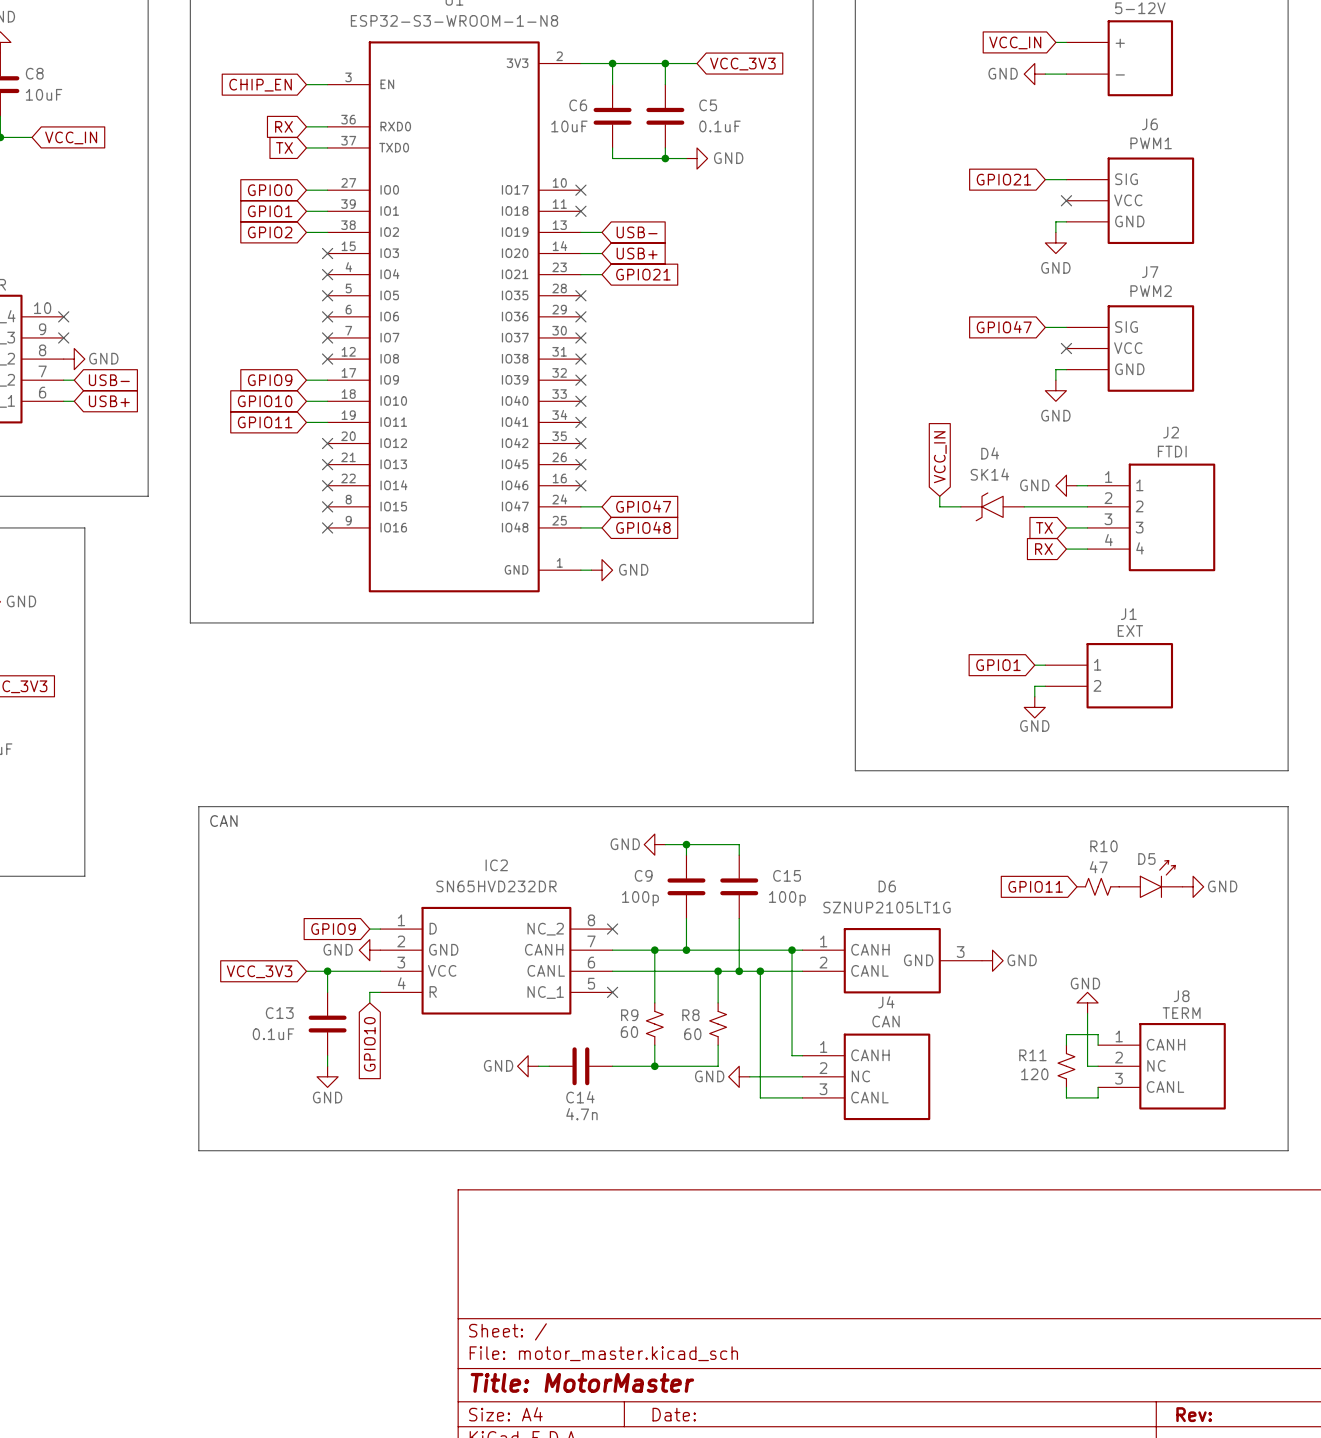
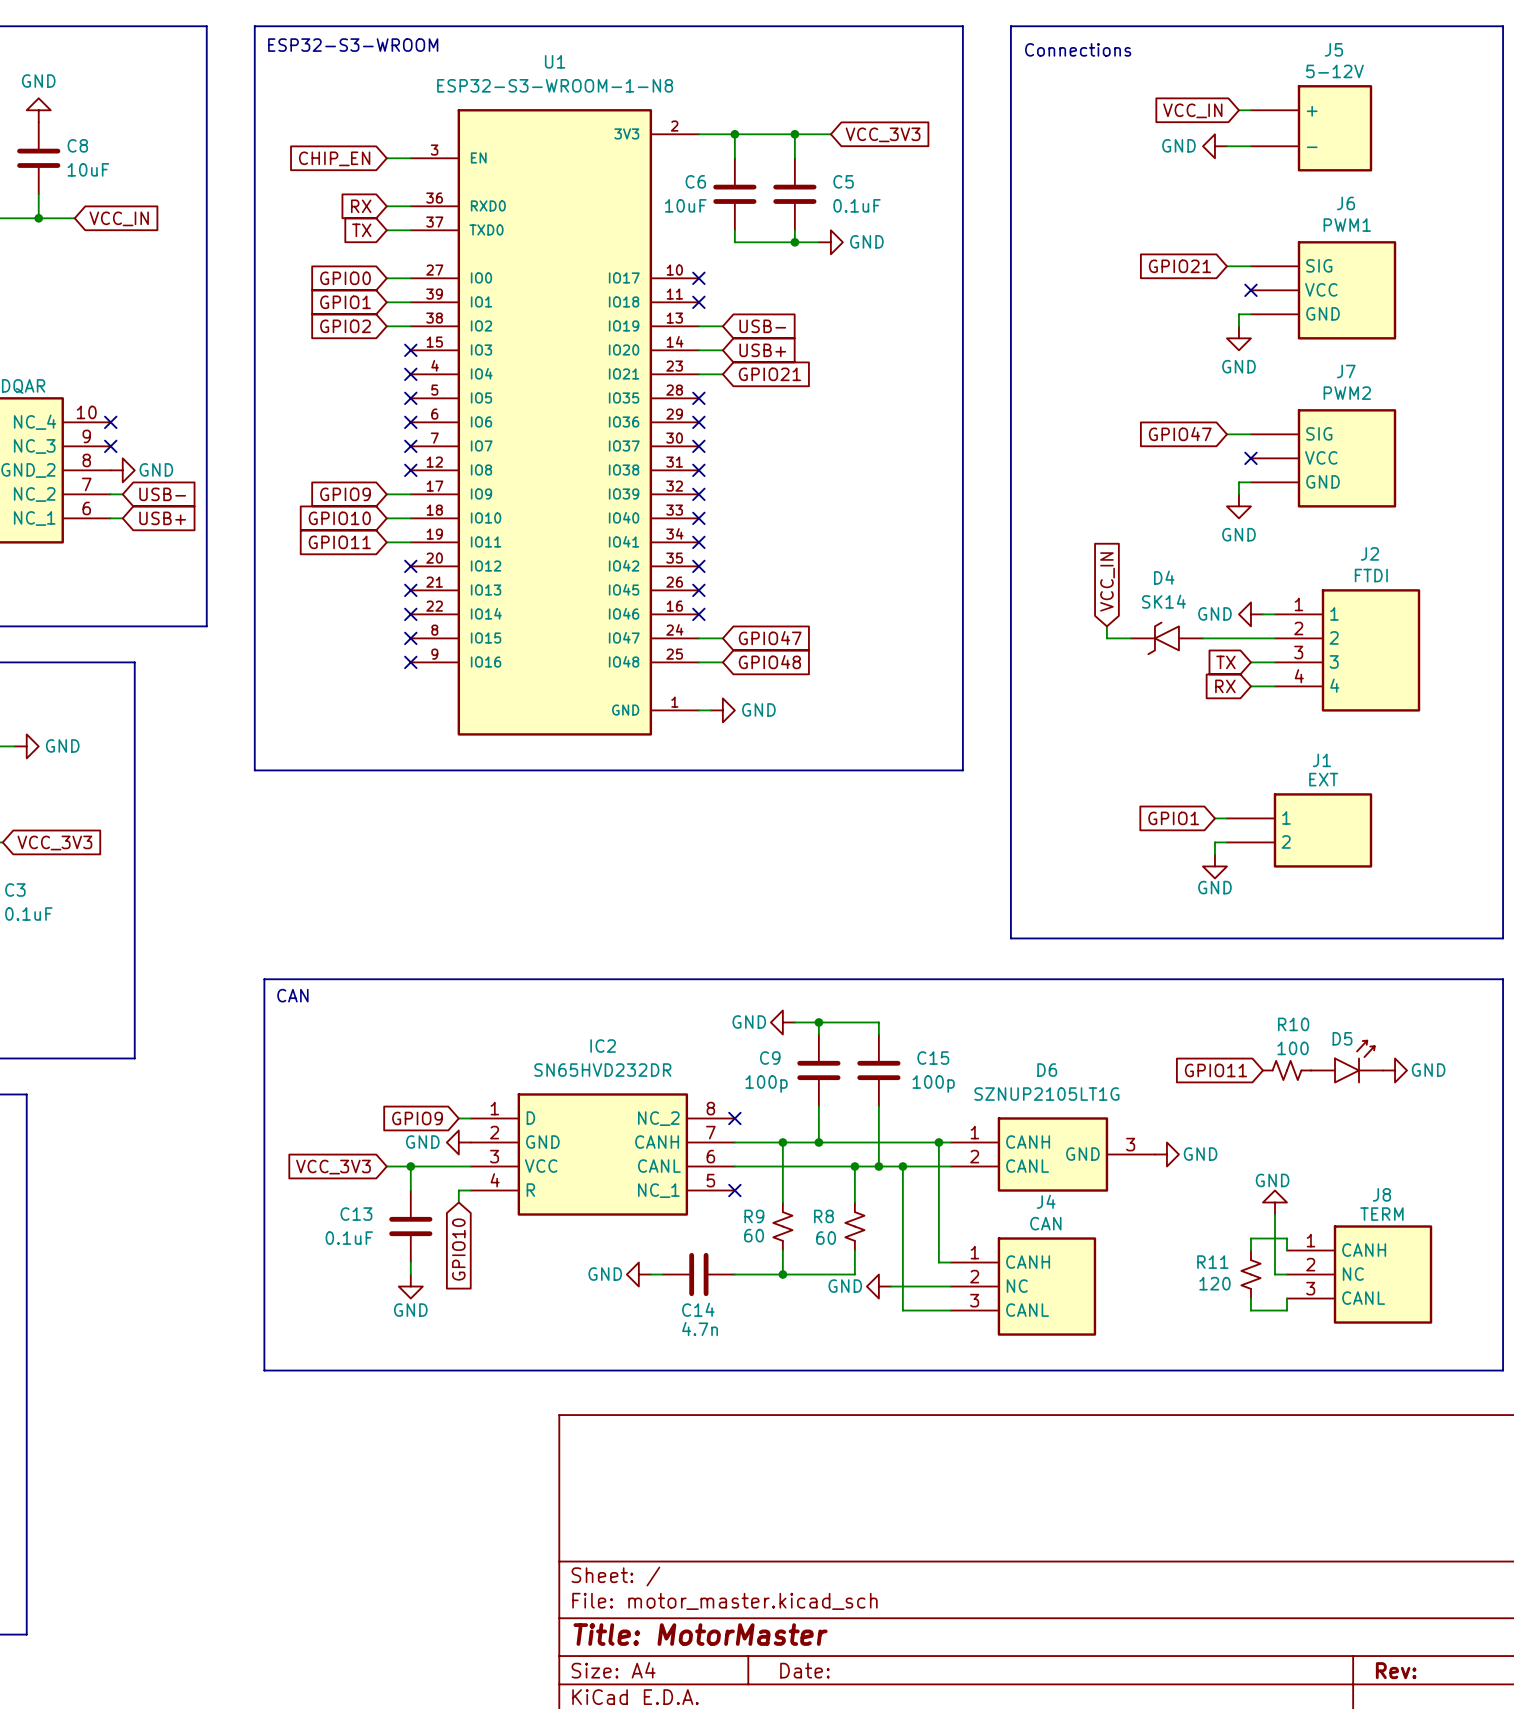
R10 value: 47 (1098, 867) -> 100 (1293, 1048)

